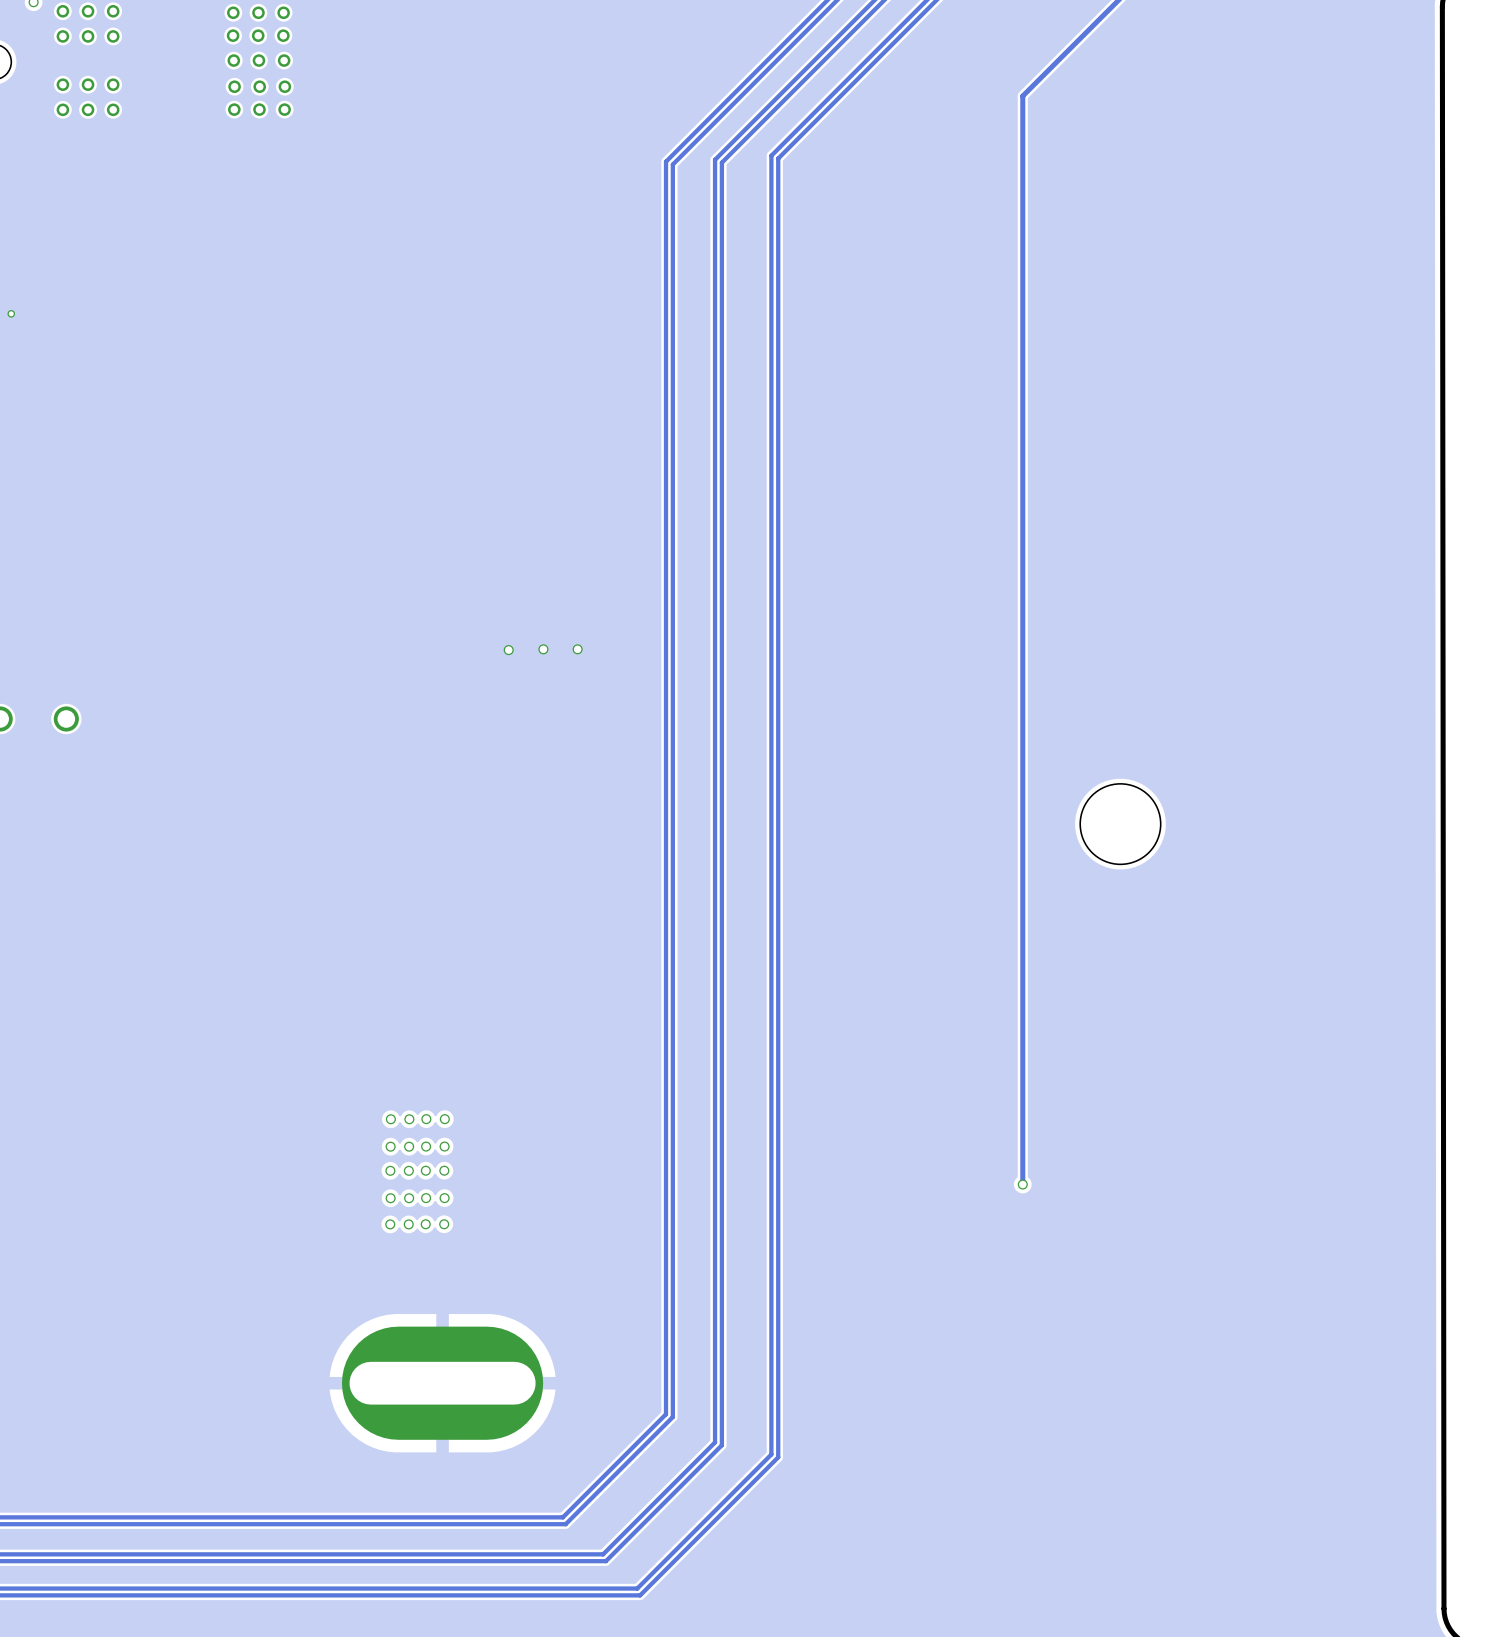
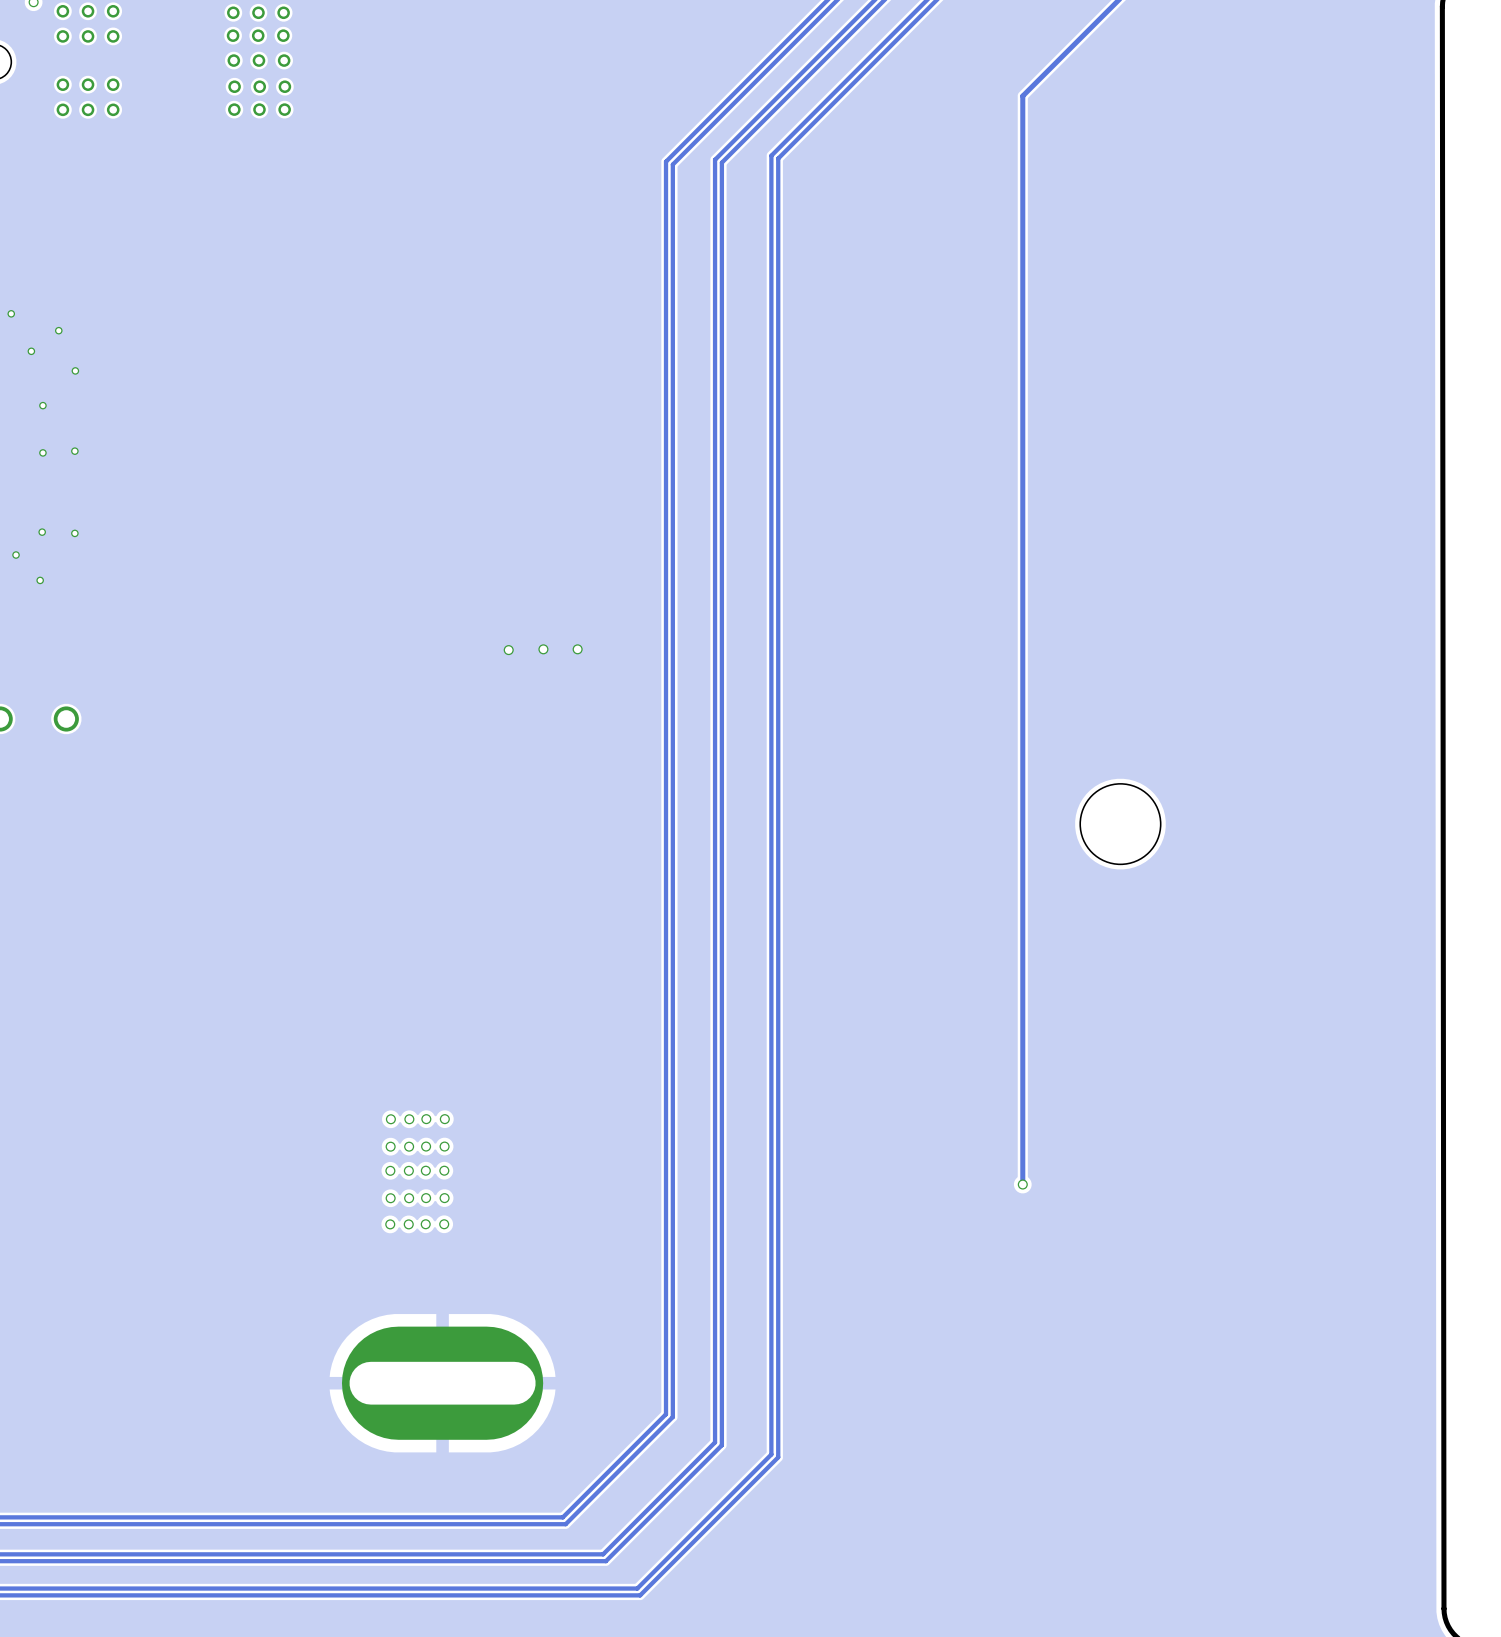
via: none -> (58, 330)
via: none -> (31, 351)
via: none -> (75, 370)
via: none -> (42, 405)
via: none -> (74, 451)
via: none -> (42, 452)
via: none -> (42, 532)
via: none -> (74, 533)
via: none -> (16, 555)
via: none -> (40, 580)

